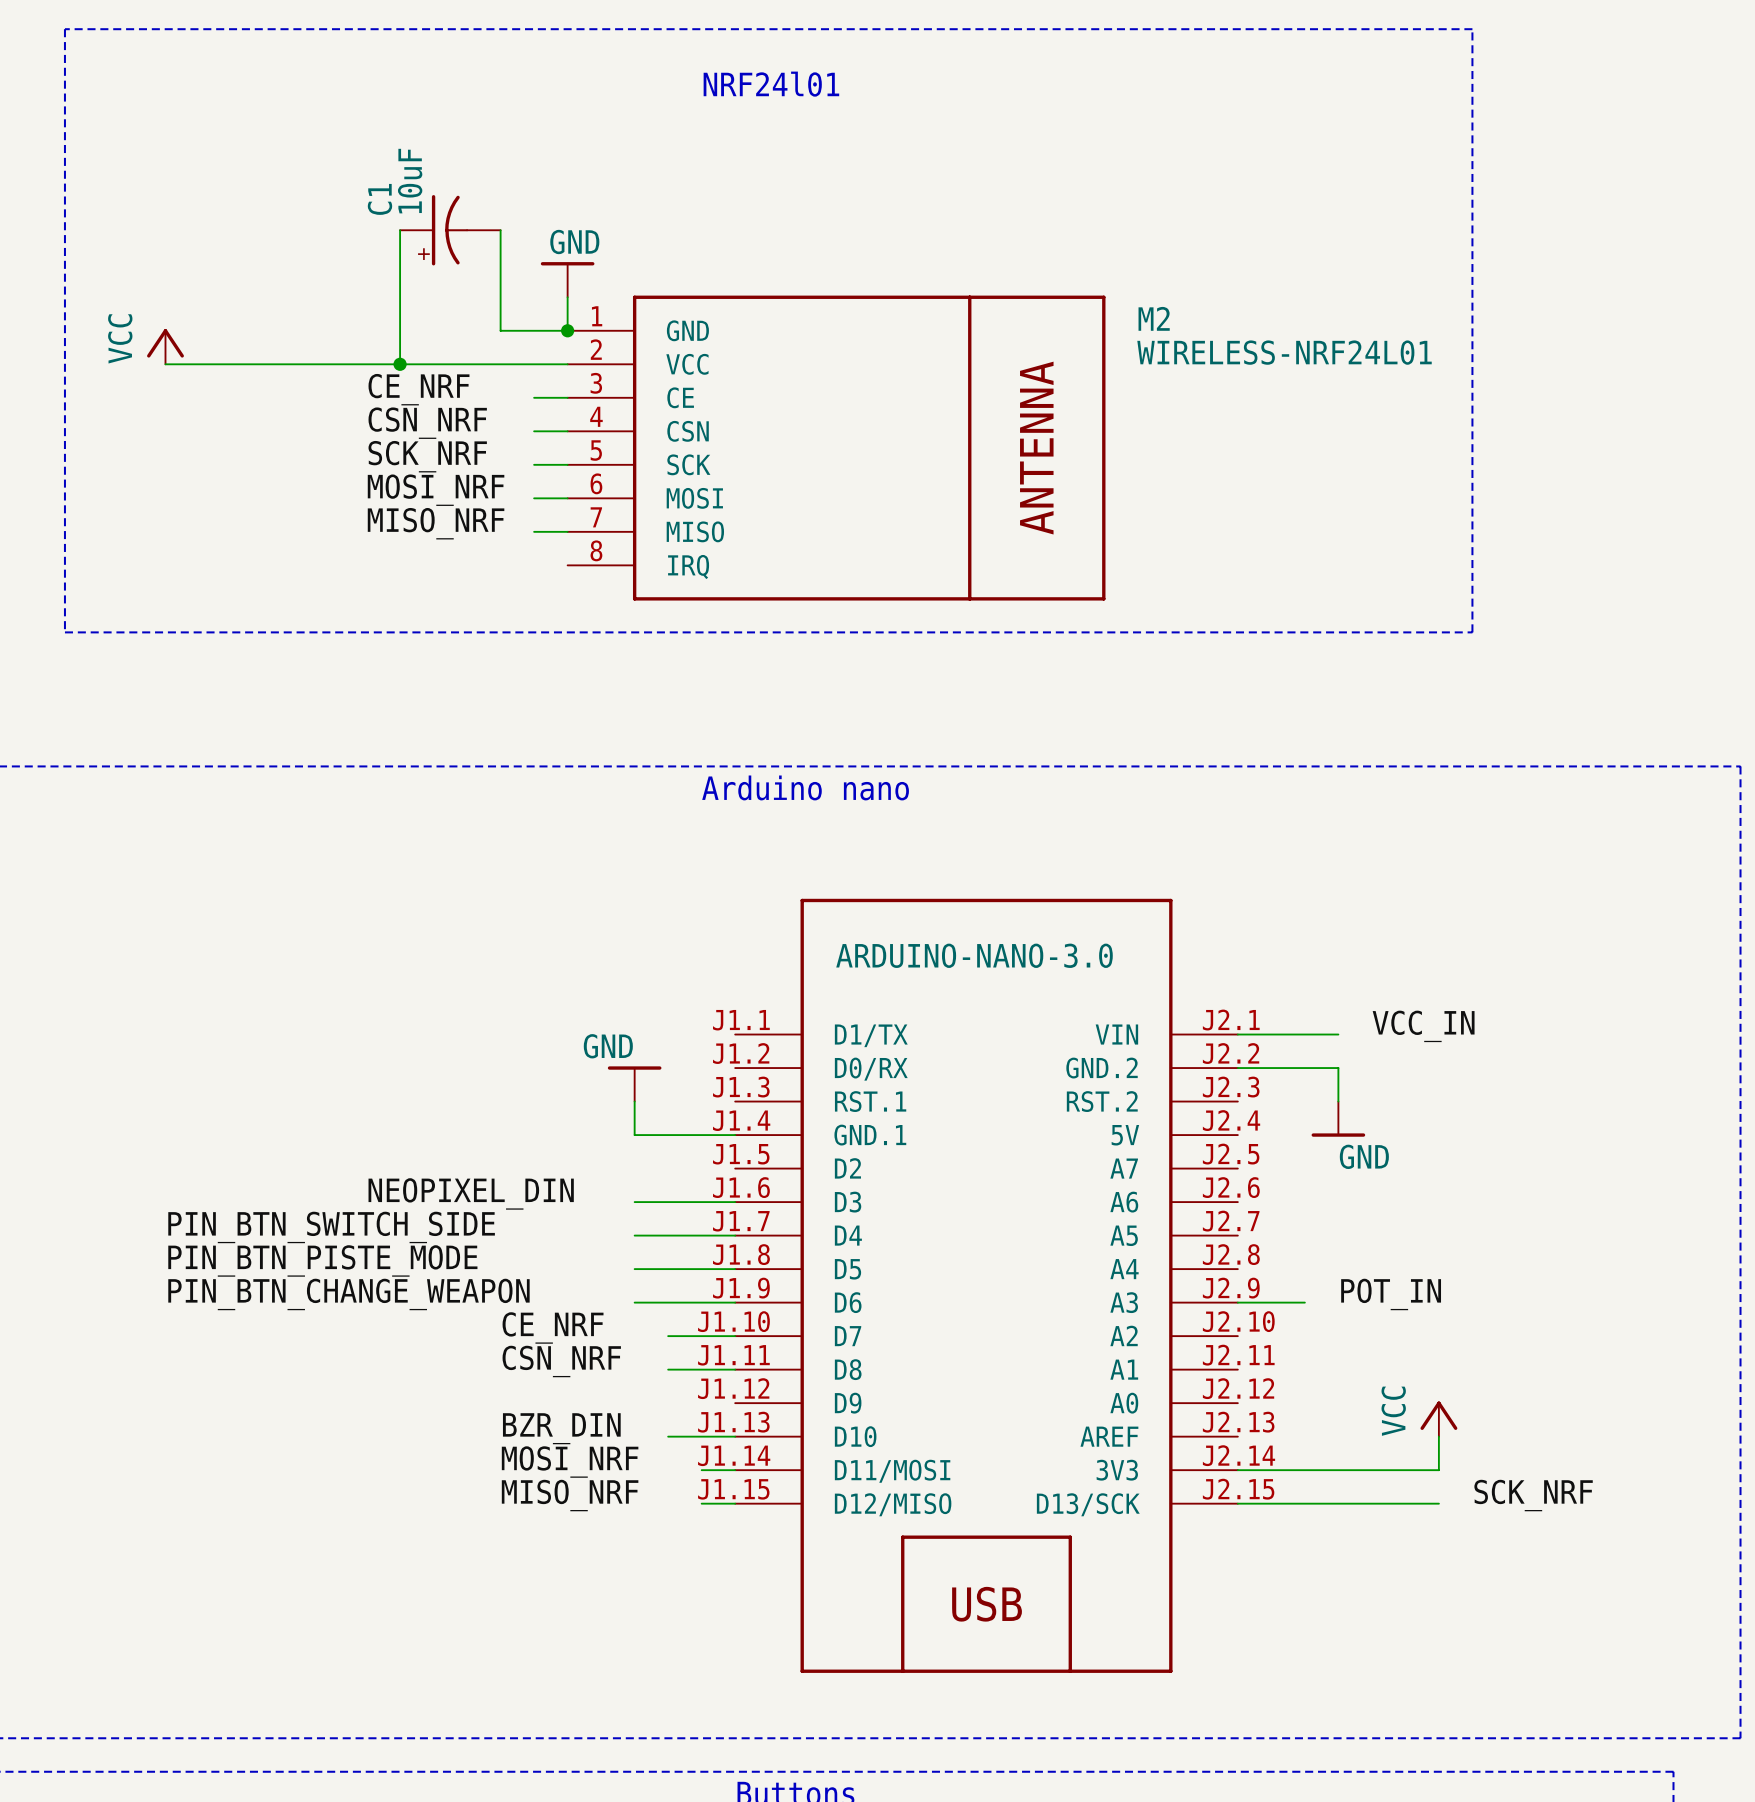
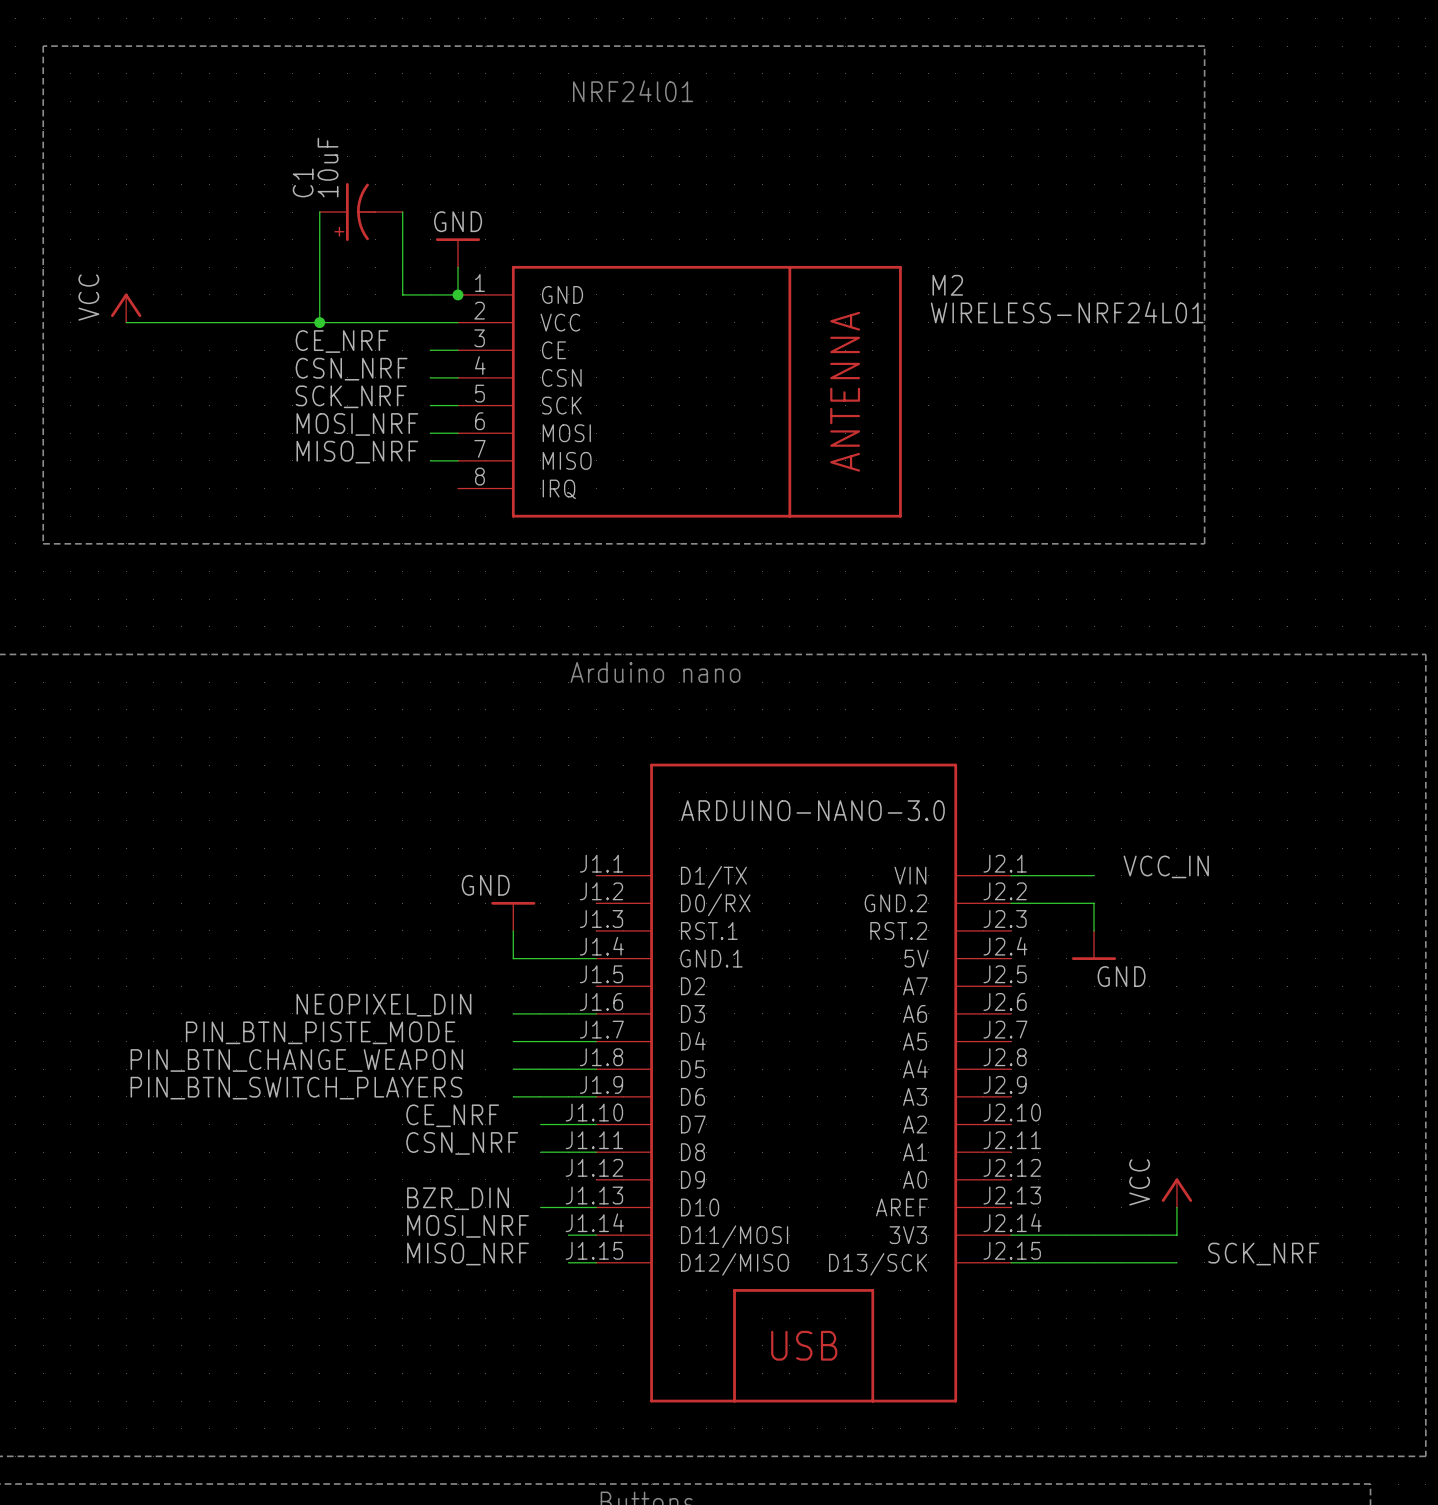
label: PIN_BTN_SWITCH_SIDE (331, 1227) -> PIN_BTN_PISTE_MODE (320, 1032)
label: PIN_BTN_PISTE_MODE (322, 1260) -> PIN_BTN_CHANGE_WEAPON (296, 1060)
label: PIN_BTN_CHANGE_WEAPON (348, 1294) -> PIN_BTN_SWITCH_PLAYERS (296, 1088)
label: POT_IN (1391, 1294) -> none
wire: (1237, 1302) (1304, 1302) -> none

